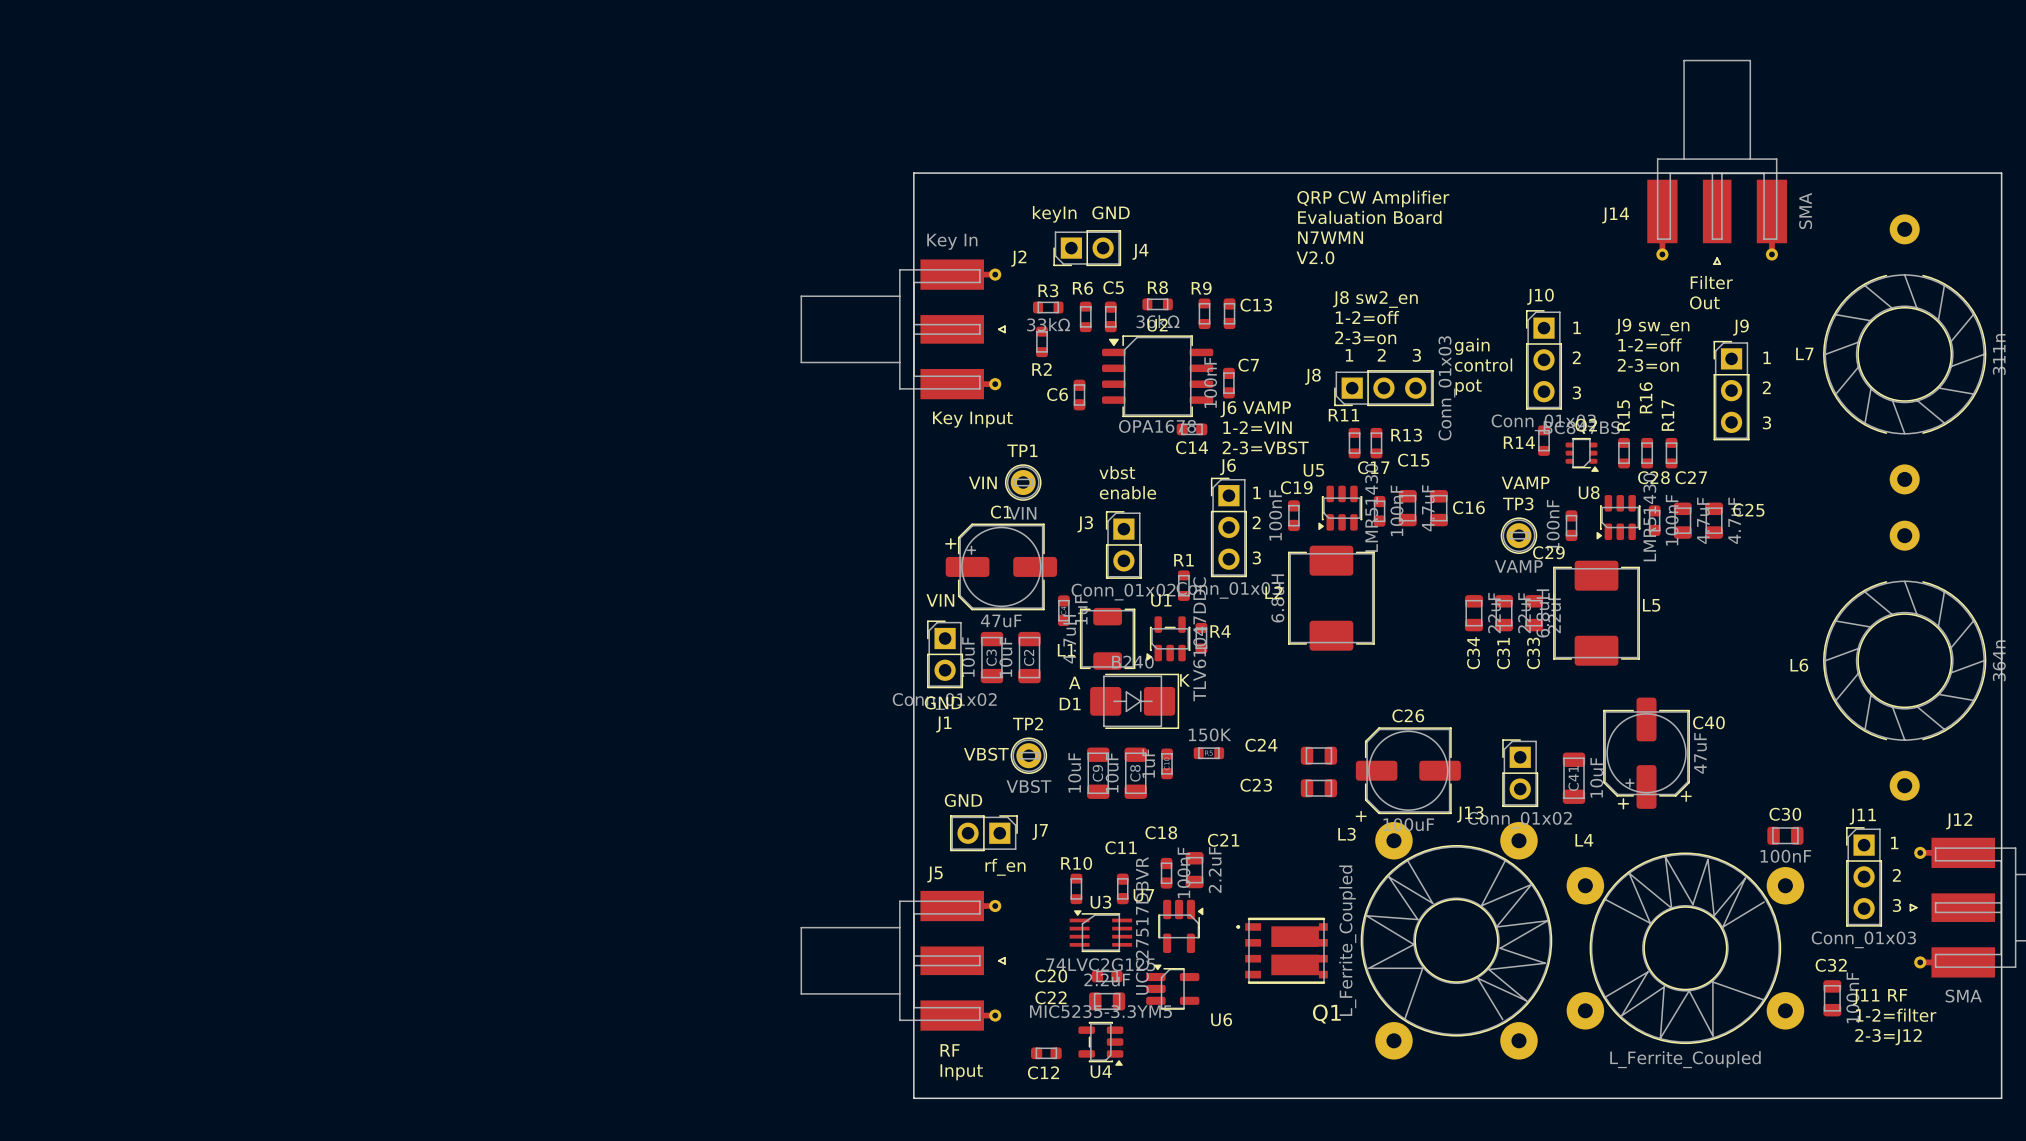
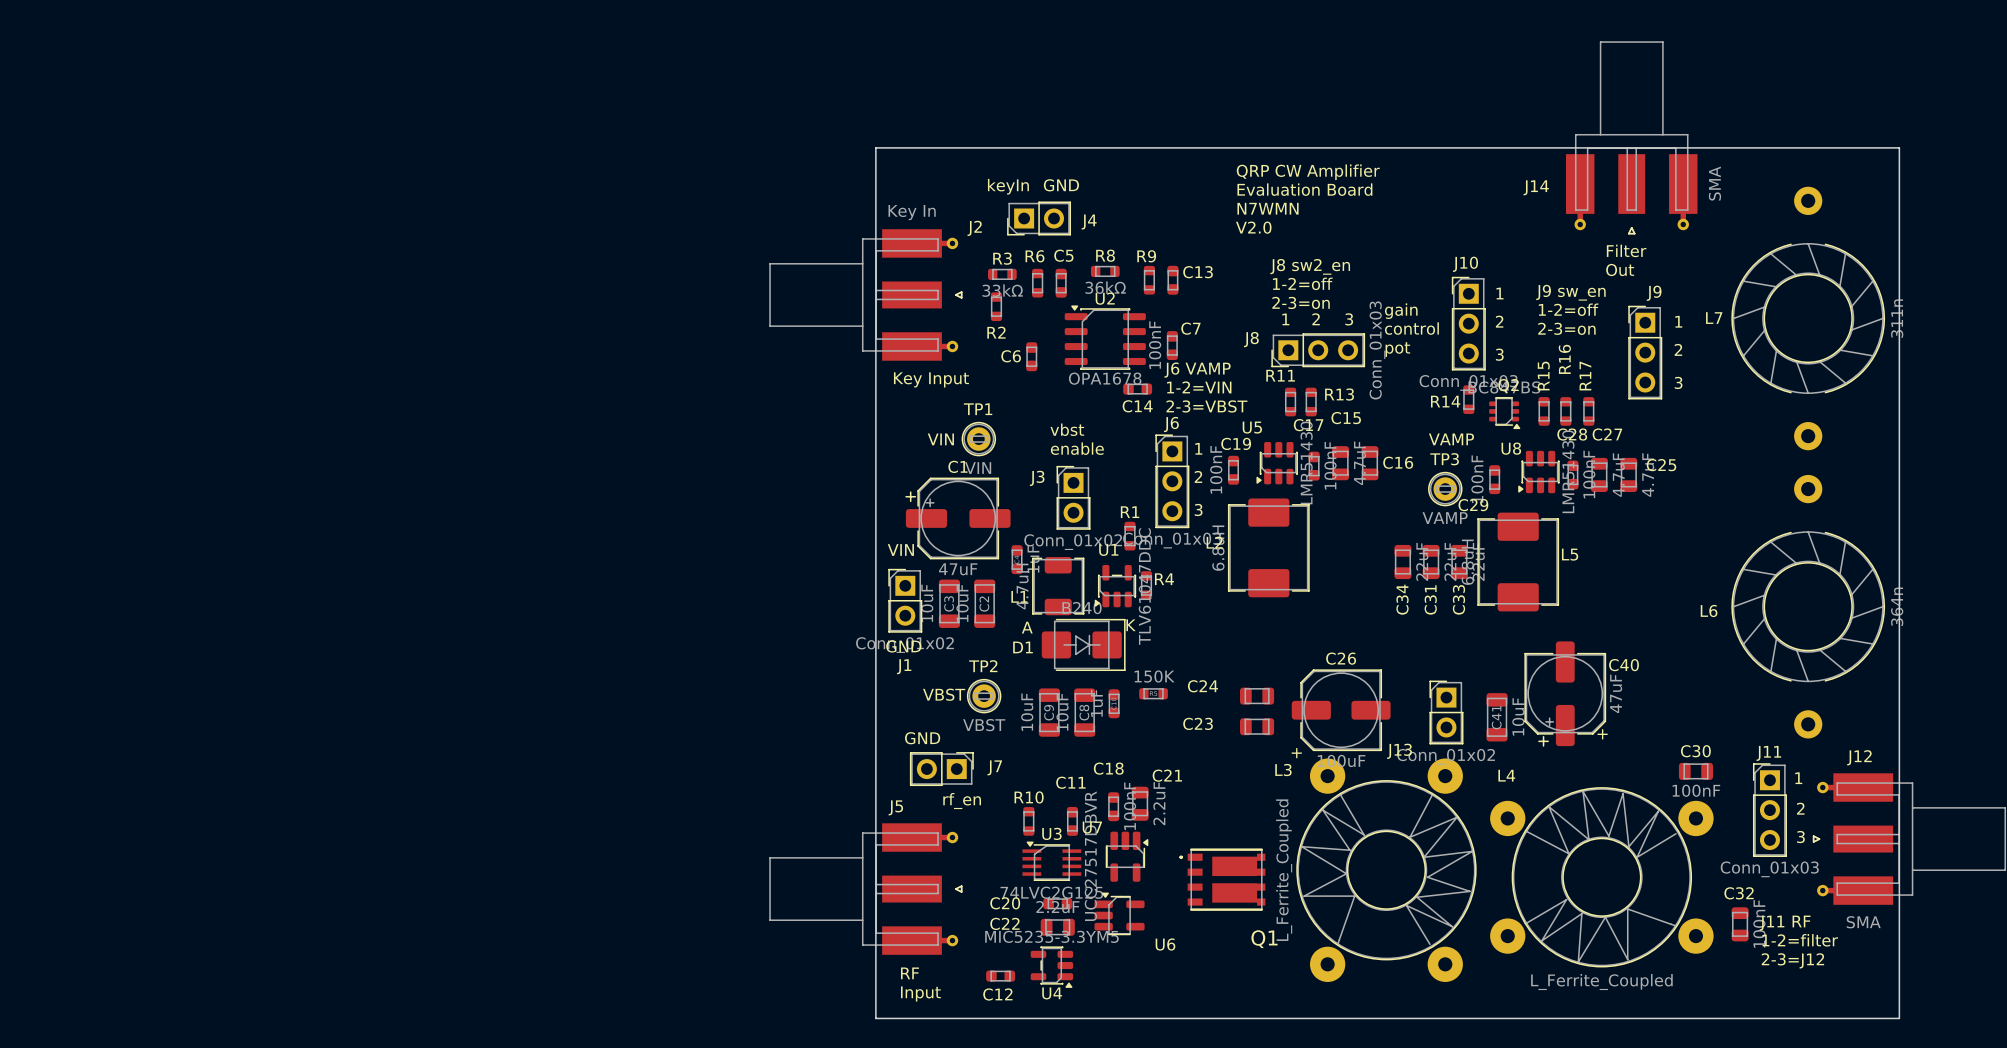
U2 footprint: [1102, 335, 1214, 418] -> [1064, 305, 1146, 370]

